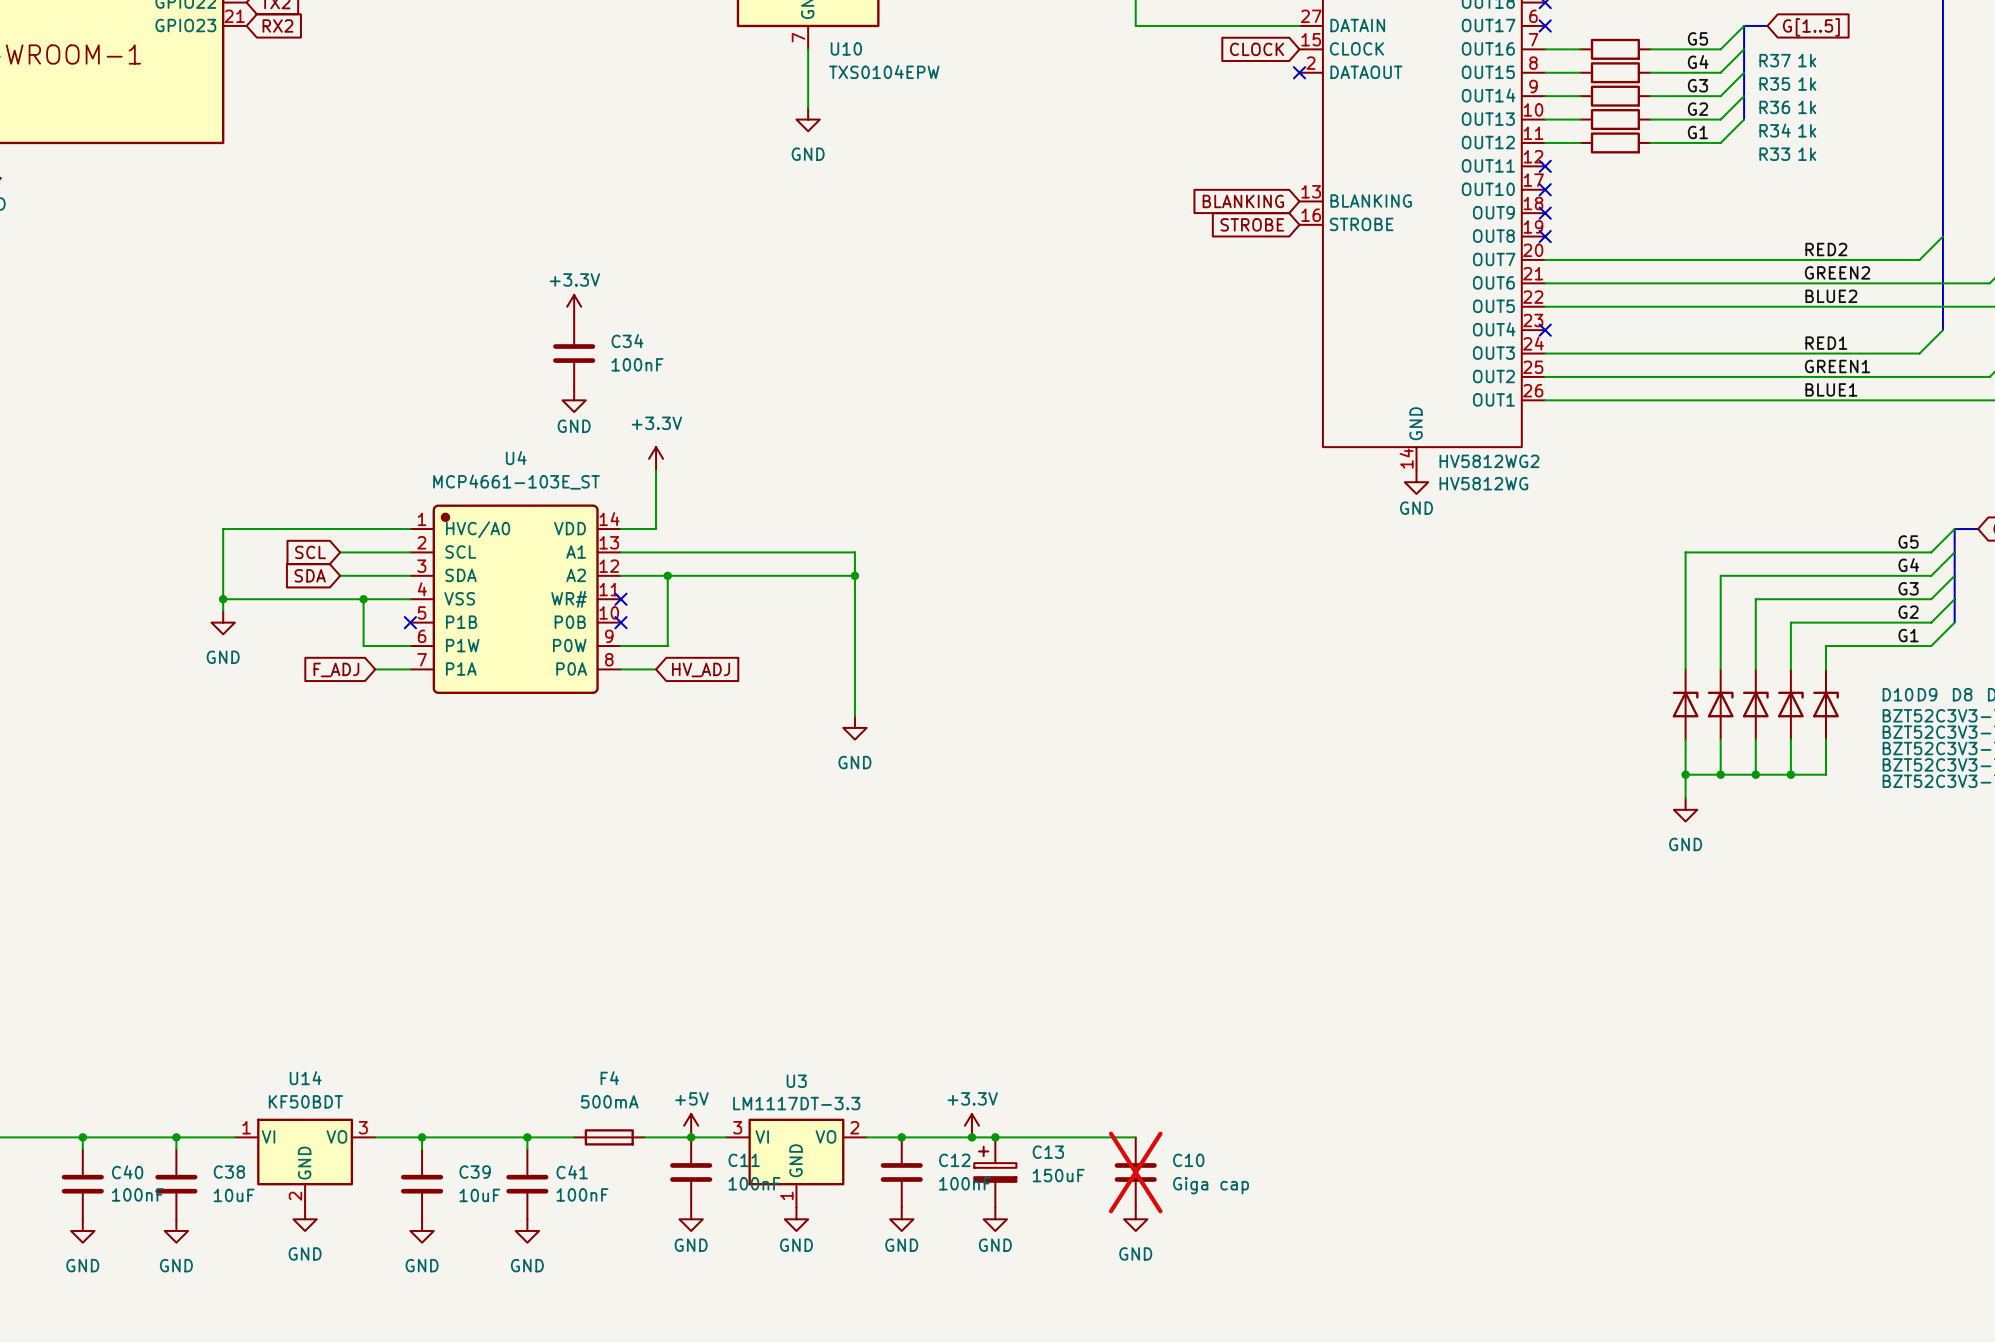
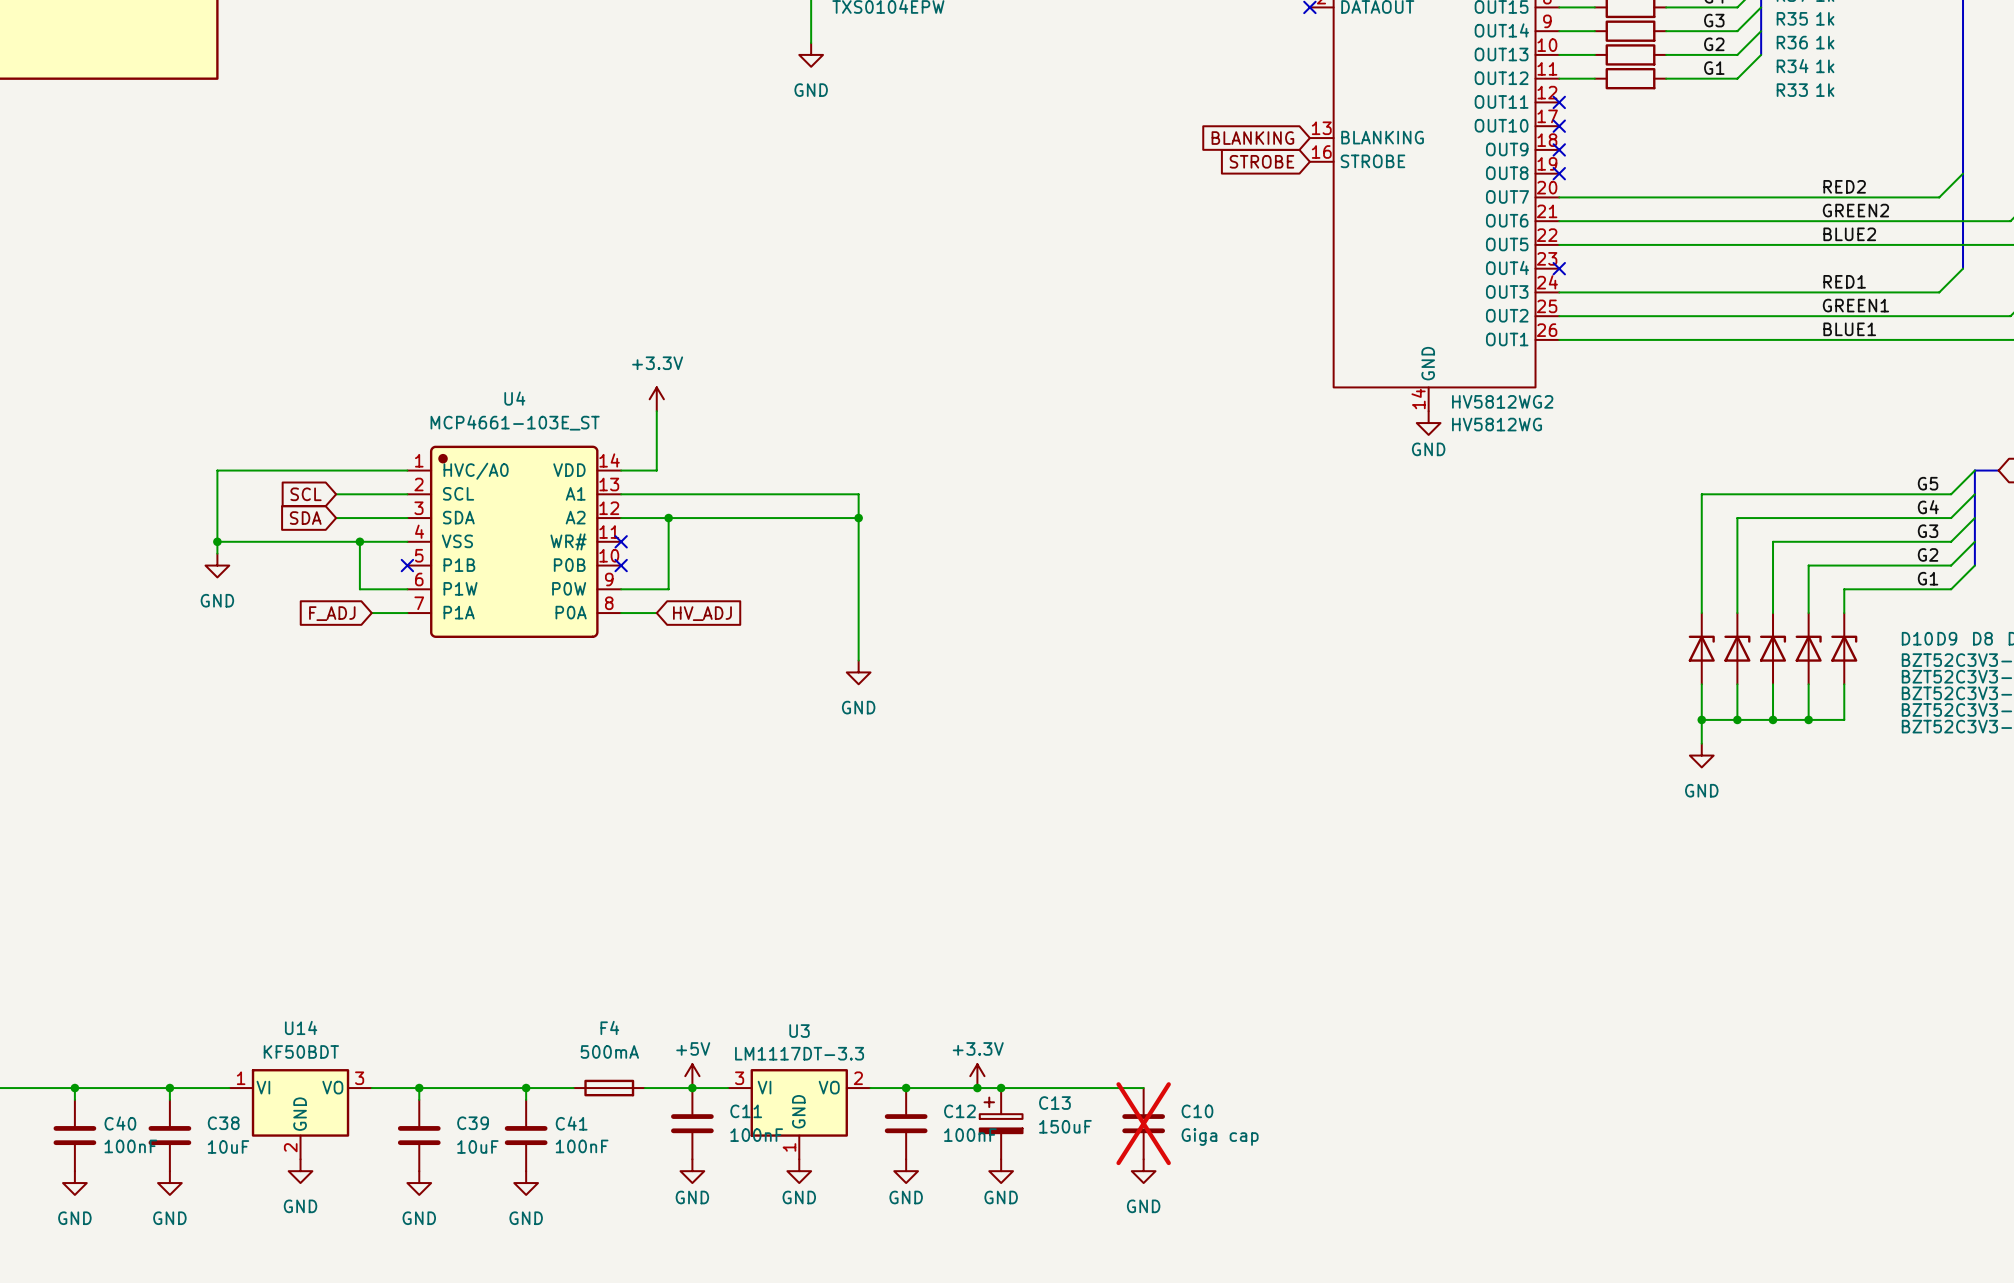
power symbol: +3.3V (574, 306) -> none
C34: 100nF (574, 353) -> none
power symbol: GND (574, 400) -> none

